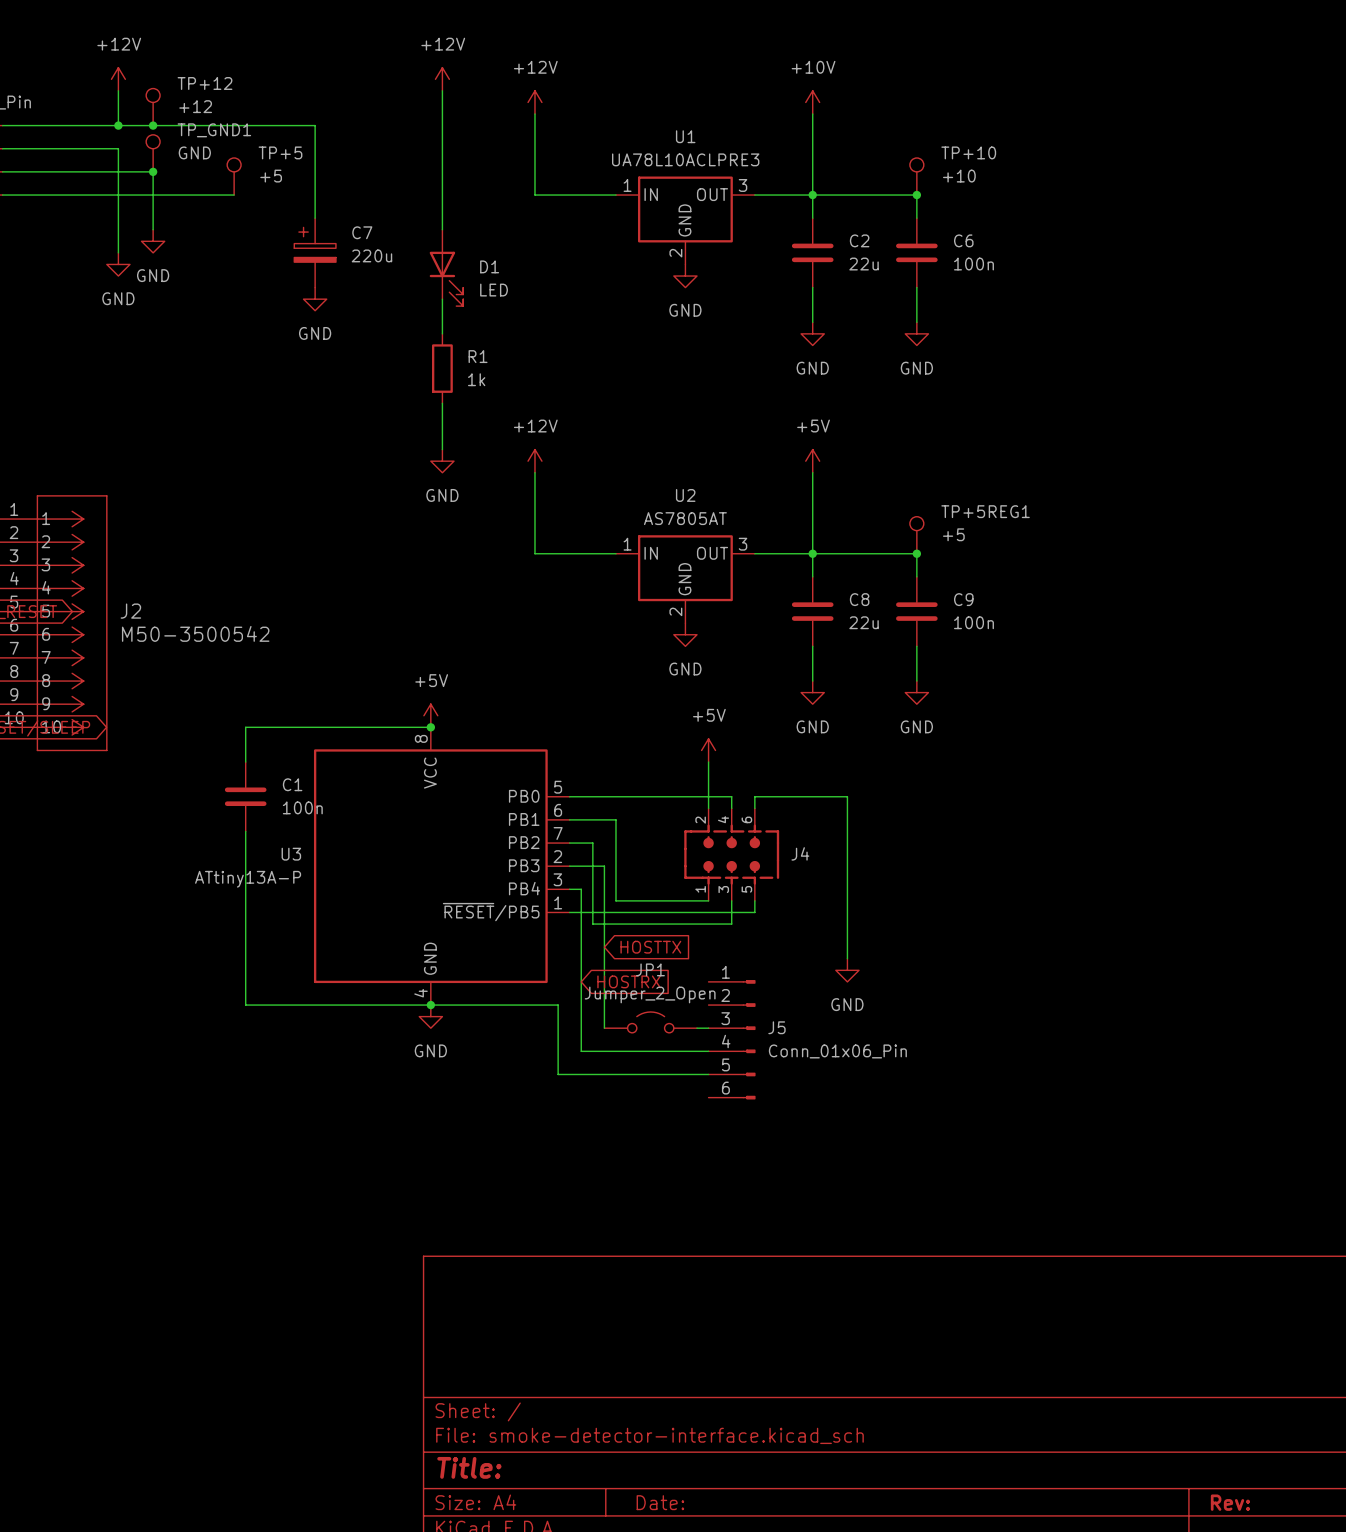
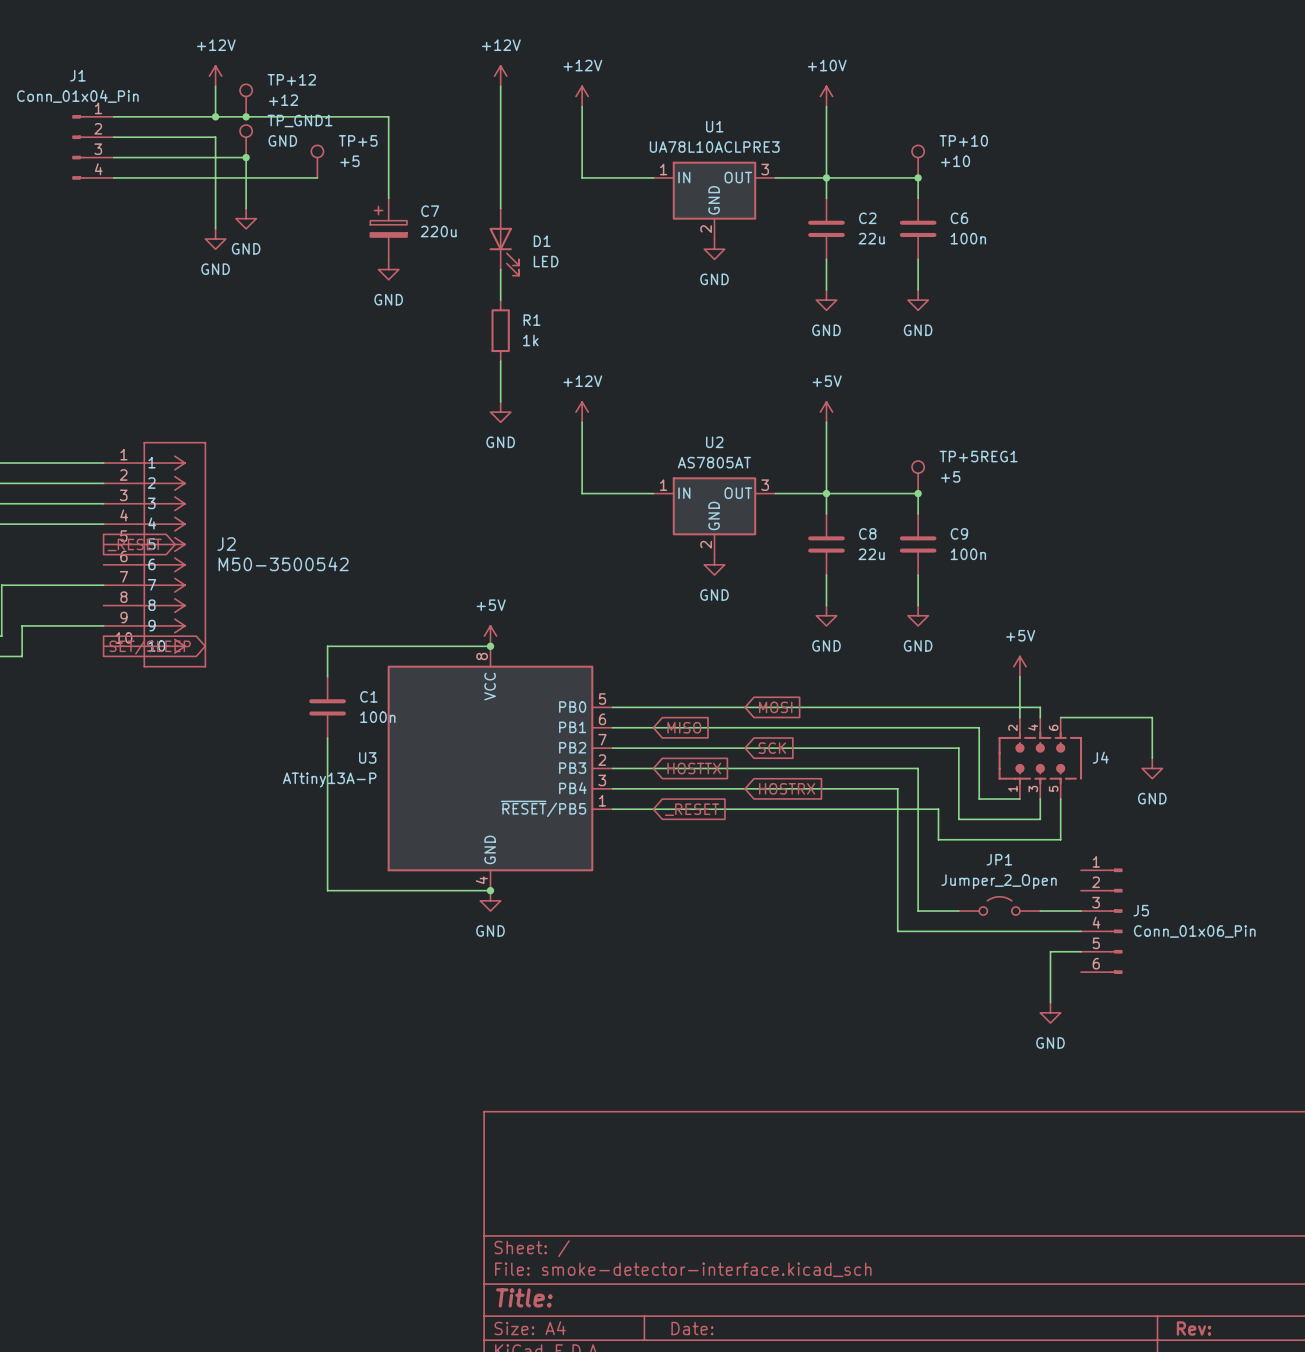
power symbol: +5V (708, 750) -> none
power symbol: none -> +5V (1019, 666)
wire: (708, 762) (708, 808) -> none
wire: none -> (1019, 676) (1019, 717)
wire: (731, 796) (731, 808) -> (755, 707) (775, 707)
wire: (754, 796) (754, 808) -> none
global label: none -> MOSI (775, 707)
wire: (847, 796) (847, 958) -> (857, 707) (1040, 707) (1040, 717)
wire: none -> (1060, 717) (1152, 717) (1152, 758)
wire: (615, 819) (615, 900) (708, 900) -> (653, 727) (979, 727) (979, 799) (1019, 799)
global label: none -> MISO (684, 727)
wire: (592, 843) (592, 924) (731, 924) (731, 900) -> (633, 748) (958, 748) (958, 819) (1040, 819) (1040, 799)
global label: none -> SCK (772, 748)
J4 position: (731, 854) -> (1040, 758)
wire: (604, 866) (604, 1028) -> (643, 768) (918, 768) (918, 911) (958, 911)
power symbol: none -> GND (1152, 768)
wire: (581, 889) (581, 1051) (708, 1051) -> (622, 788) (897, 788) (897, 931) (1081, 931)
wire: (754, 900) (754, 912) -> (1060, 799) (1060, 839) (938, 839) (938, 809) (775, 809)
global label: none -> _RESET (692, 809)
global label position: HOSTTX (650, 947) -> HOSTTX (694, 768)
power symbol: GND (847, 970) -> none
global label position: HOSTRX (629, 981) -> HOSTRX (787, 788)
wire: (430, 1005) (558, 1005) (558, 1074) (708, 1074) -> none
JP1 position: (650, 1022) -> (999, 905)
wire: (696, 1028) (708, 1028) -> none
wire: none -> (1040, 911) (1081, 911)
J5 position: (732, 1039) -> (1101, 921)
wire: none -> (1081, 951) (1050, 951) (1050, 1002)
power symbol: none -> GND (1050, 1012)

